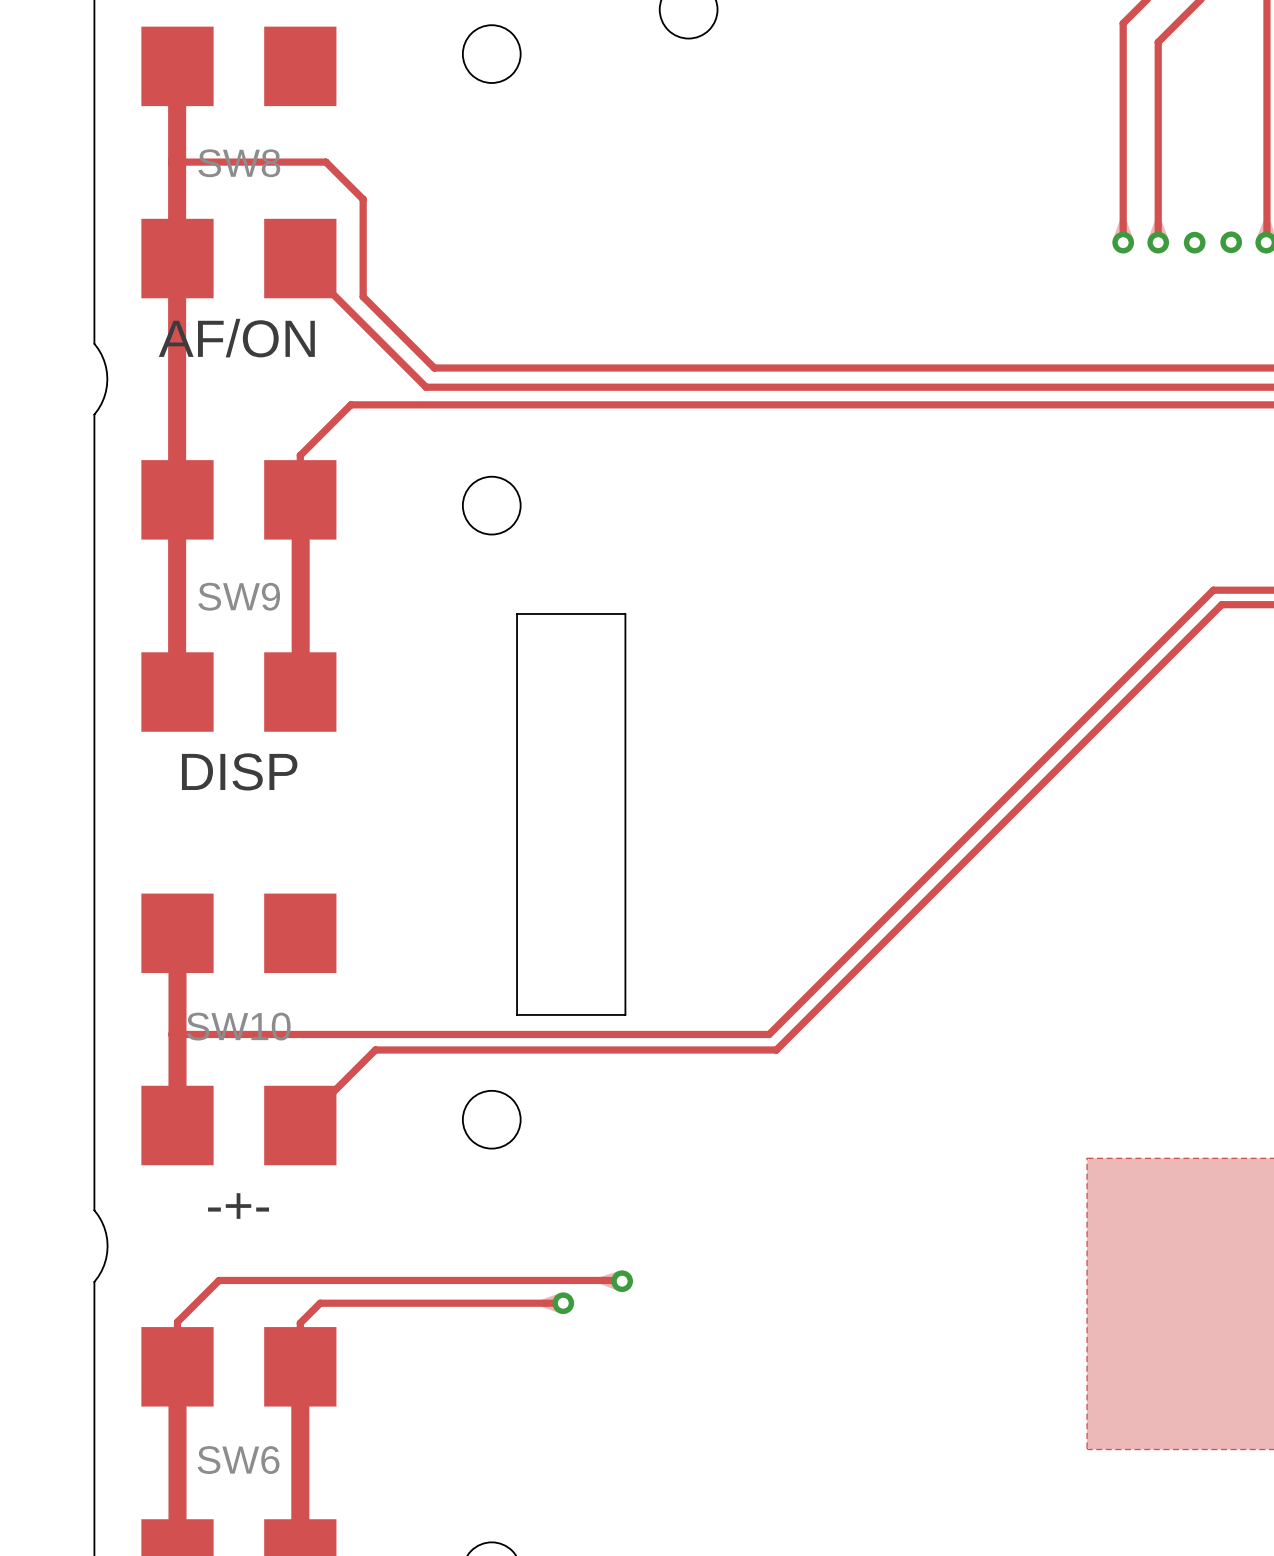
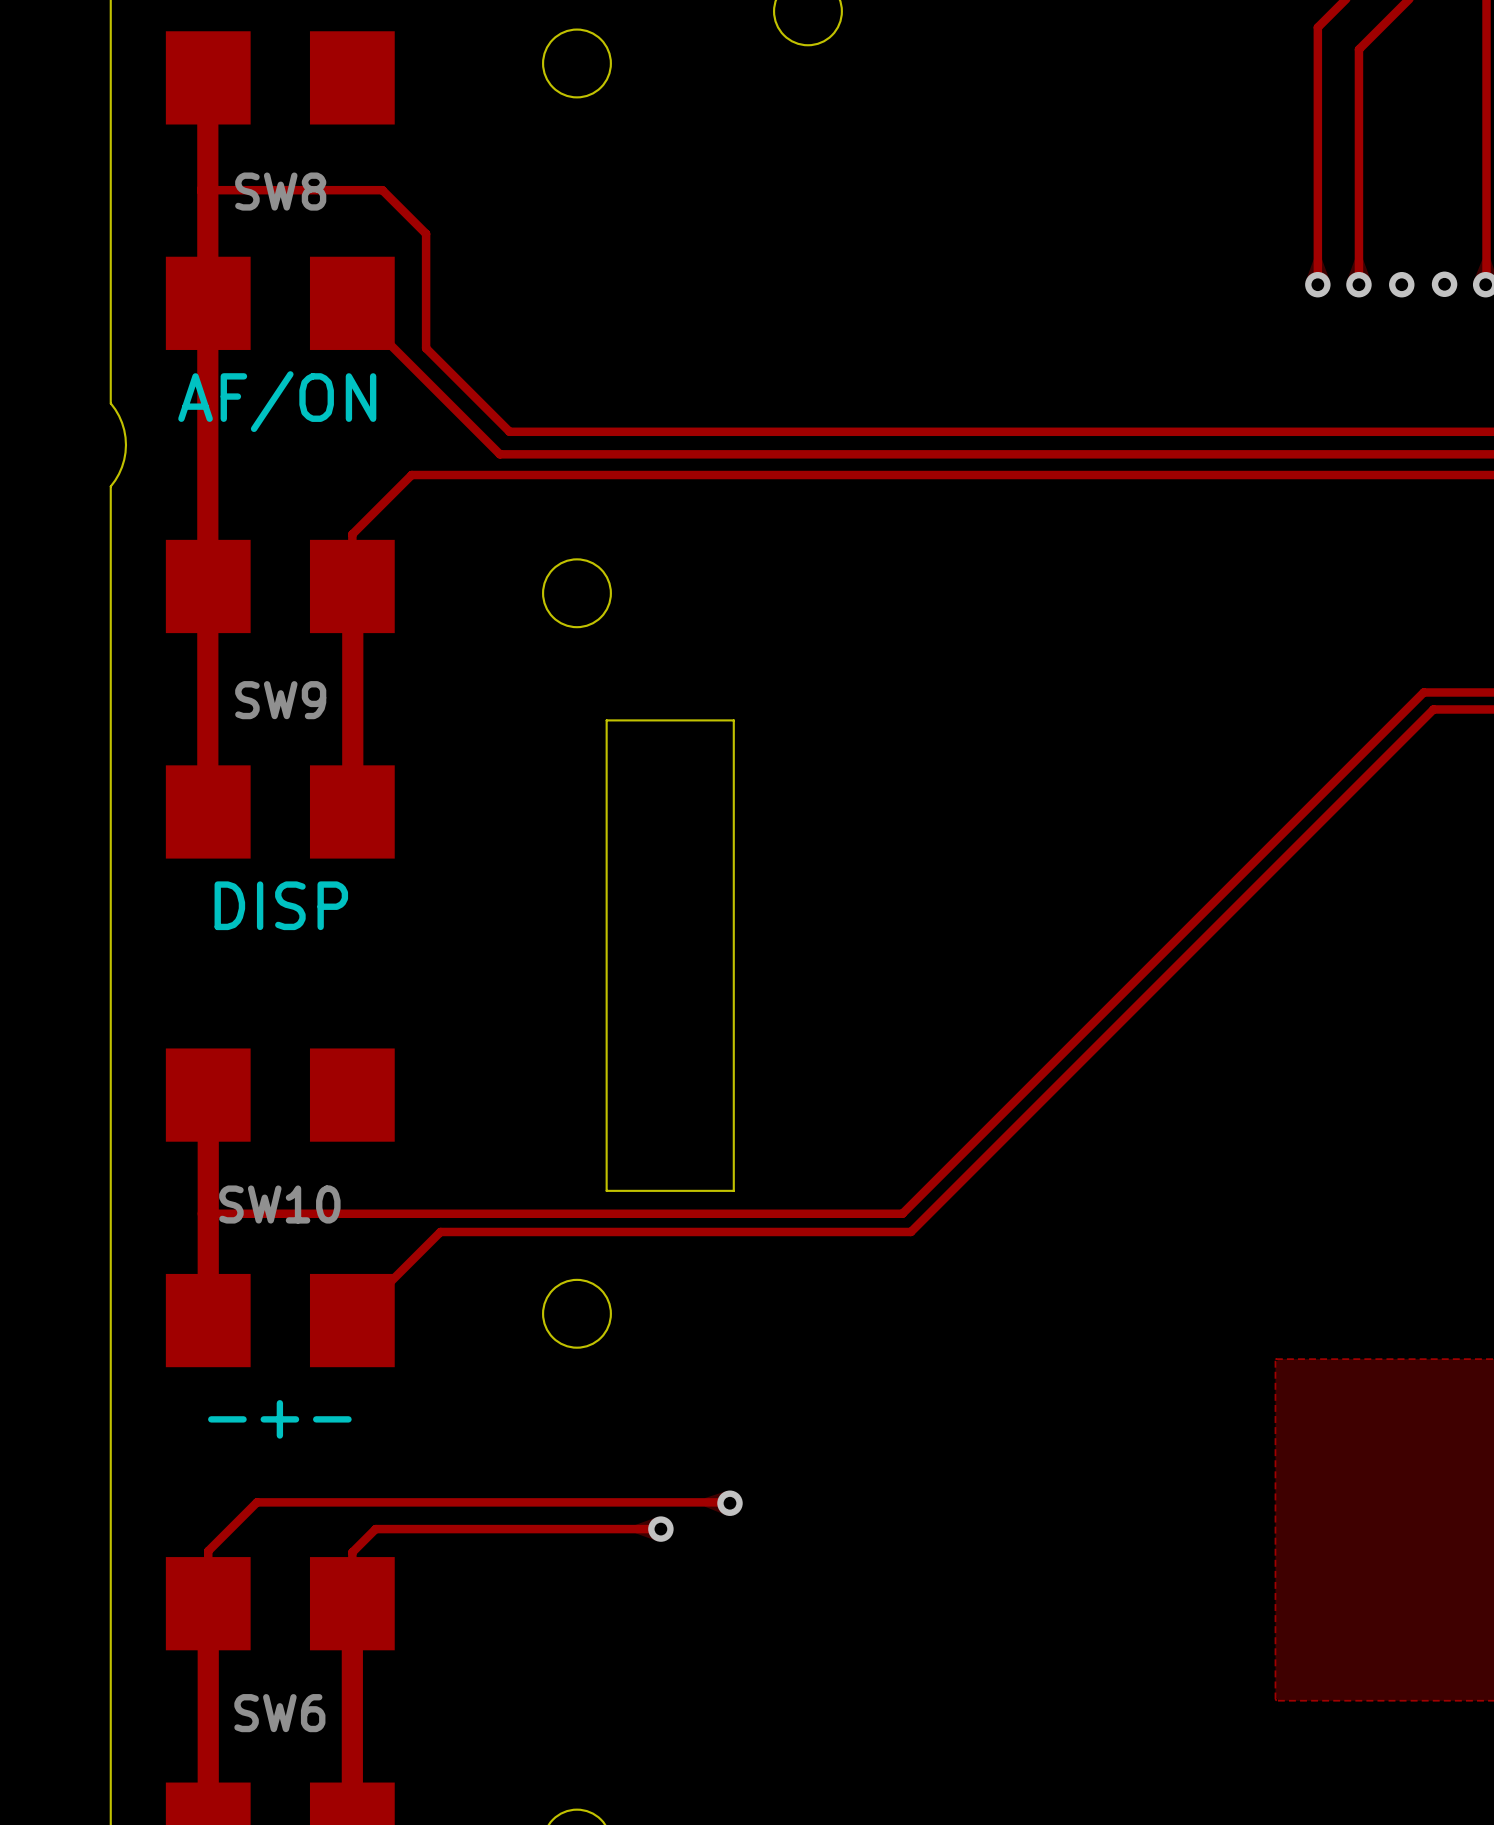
board edge: (94, 1210) (104, 1227) (107, 1246) (104, 1265) (94, 1281) -> (110, 1420) (110, 1504)

